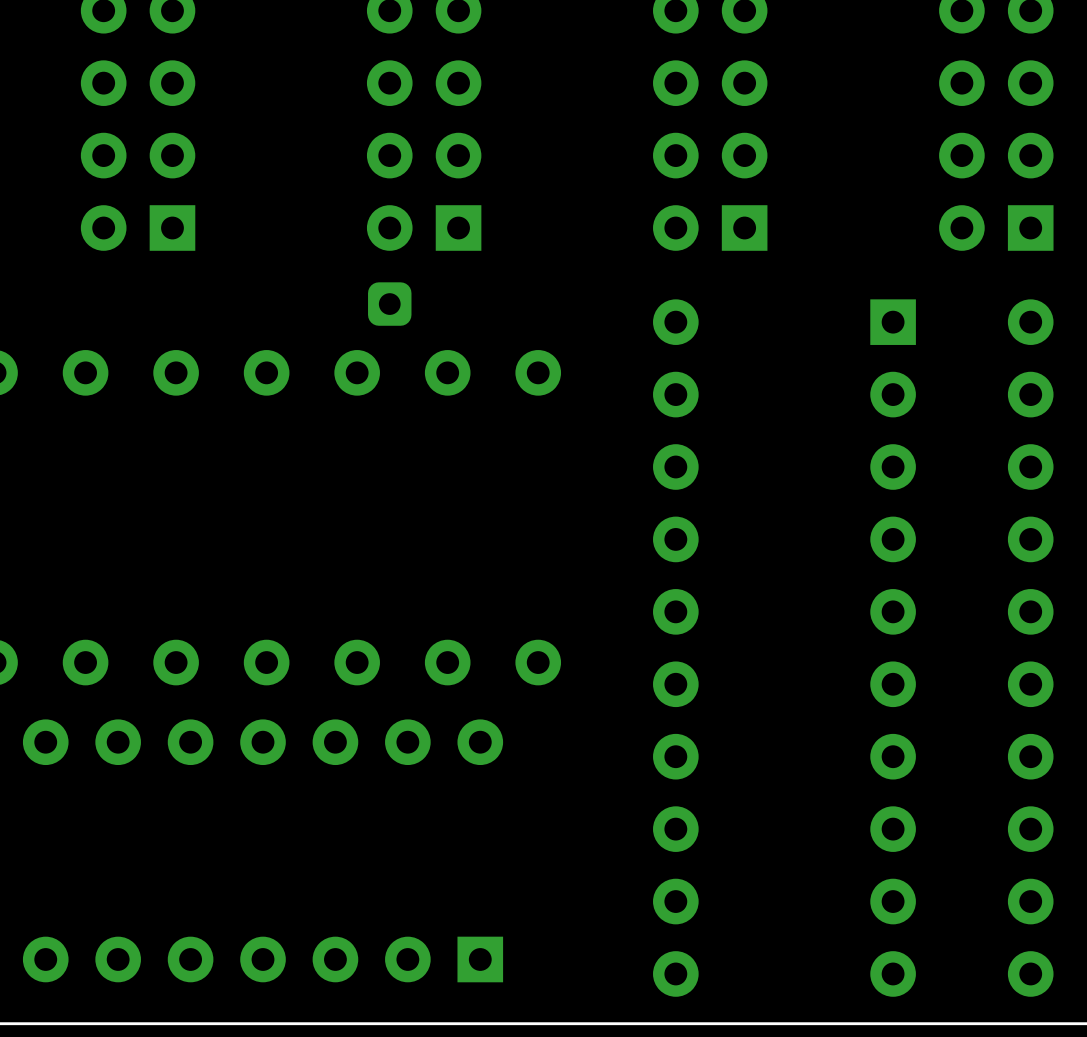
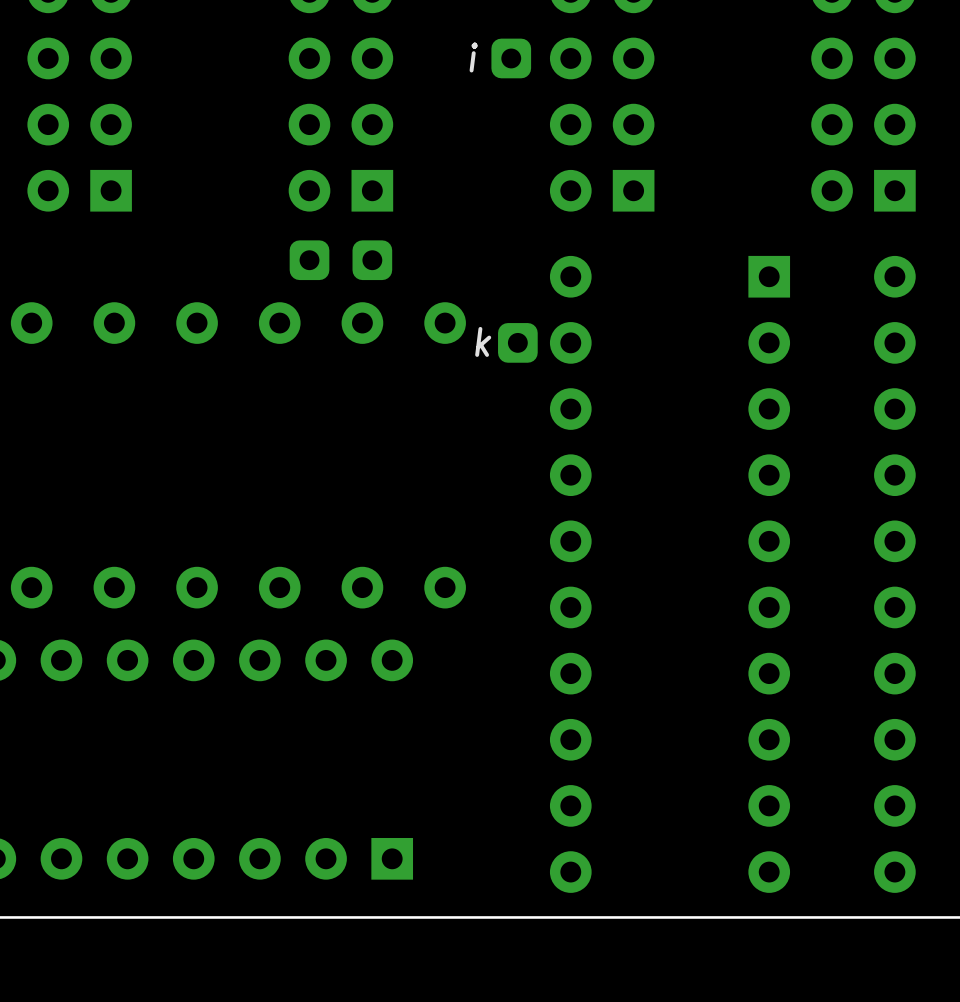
text: none -> i (473, 57)
part: none -> (511, 58)
part: none -> (372, 260)
text: none -> k (483, 341)
part: none -> (517, 342)

